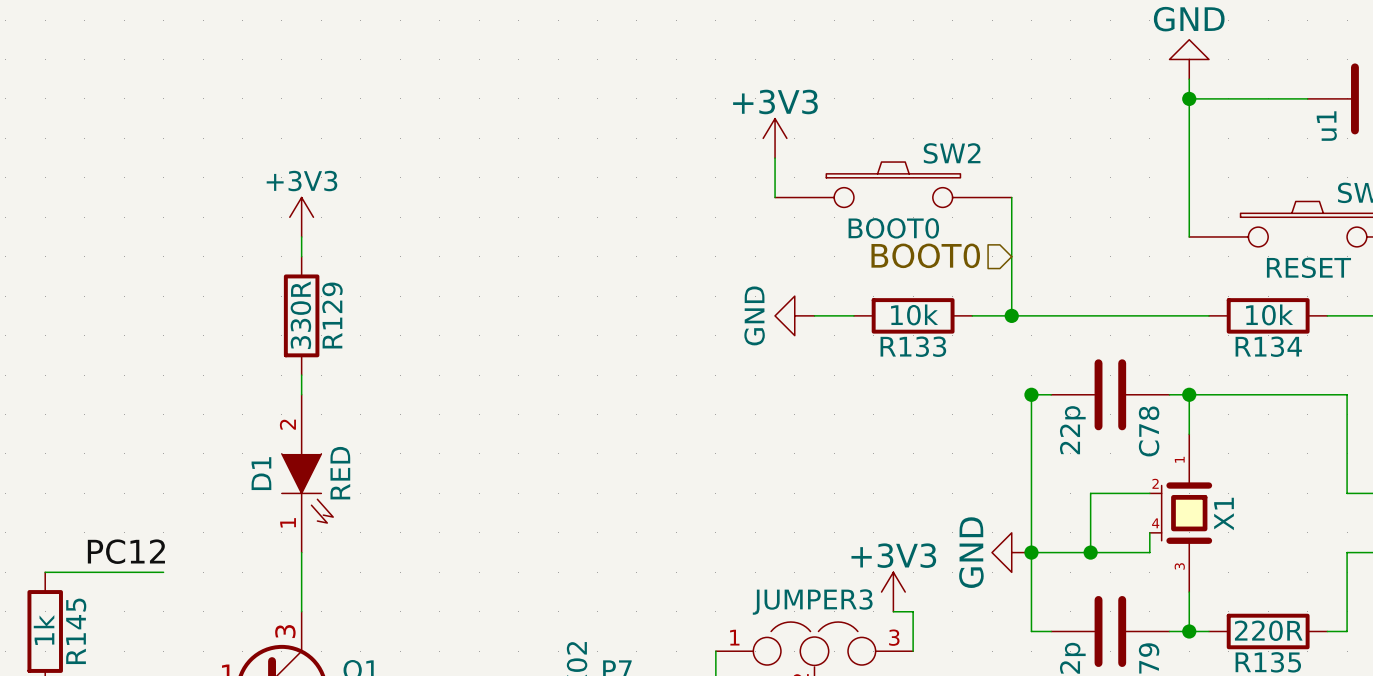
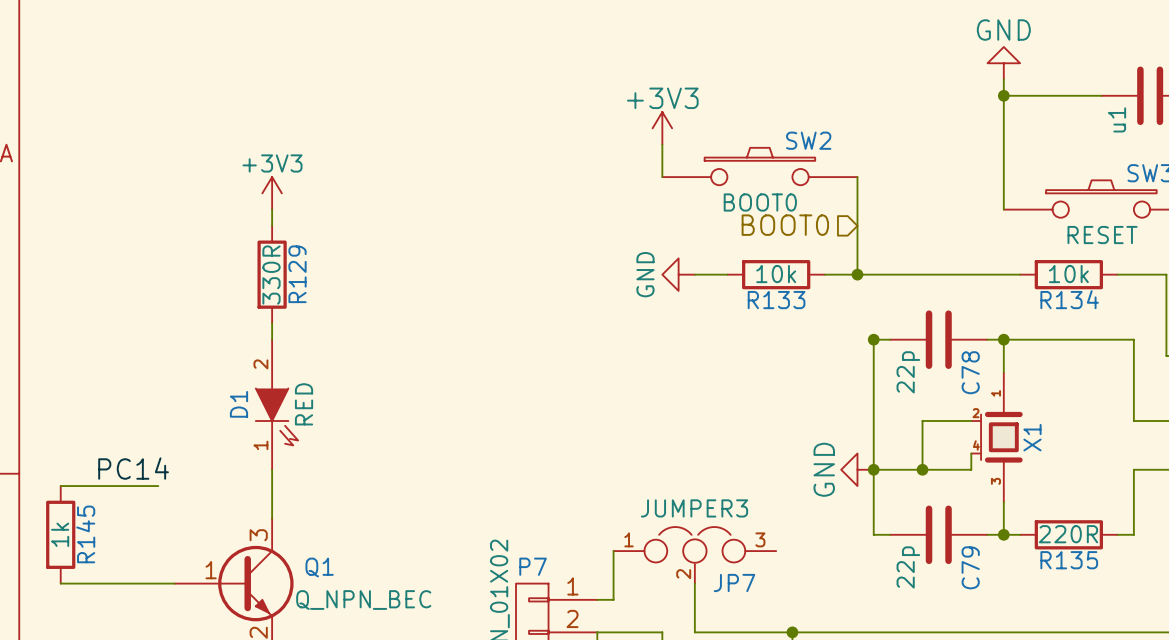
label: PC12 (126, 551) -> PC14 (133, 468)
power symbol: +3V3 (893, 592) -> none
wire: (893, 611) (913, 611) (913, 651) -> none

